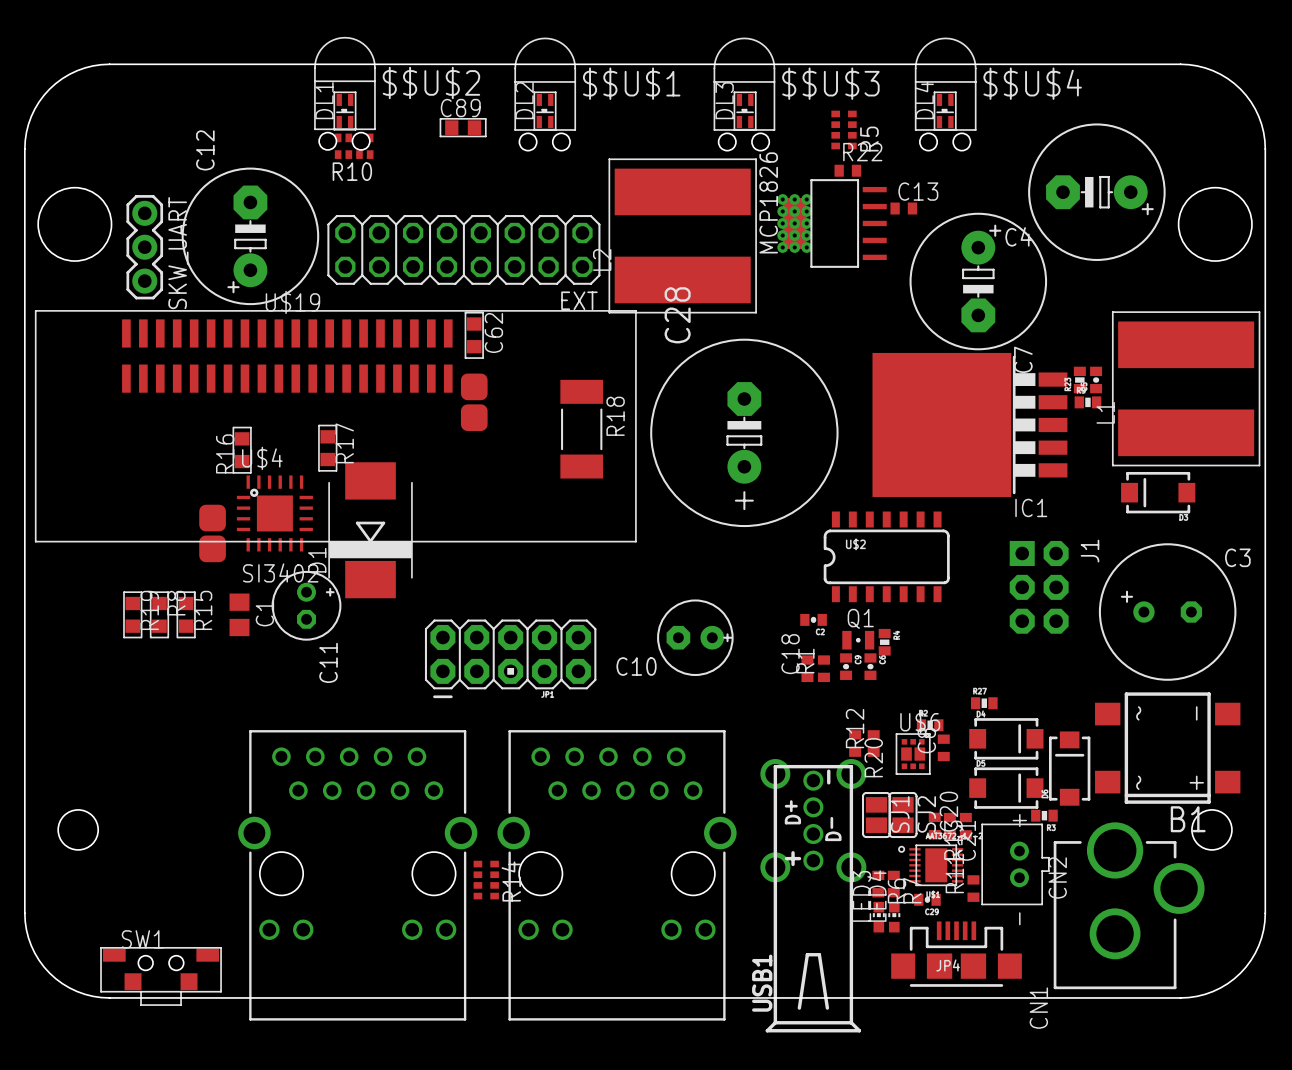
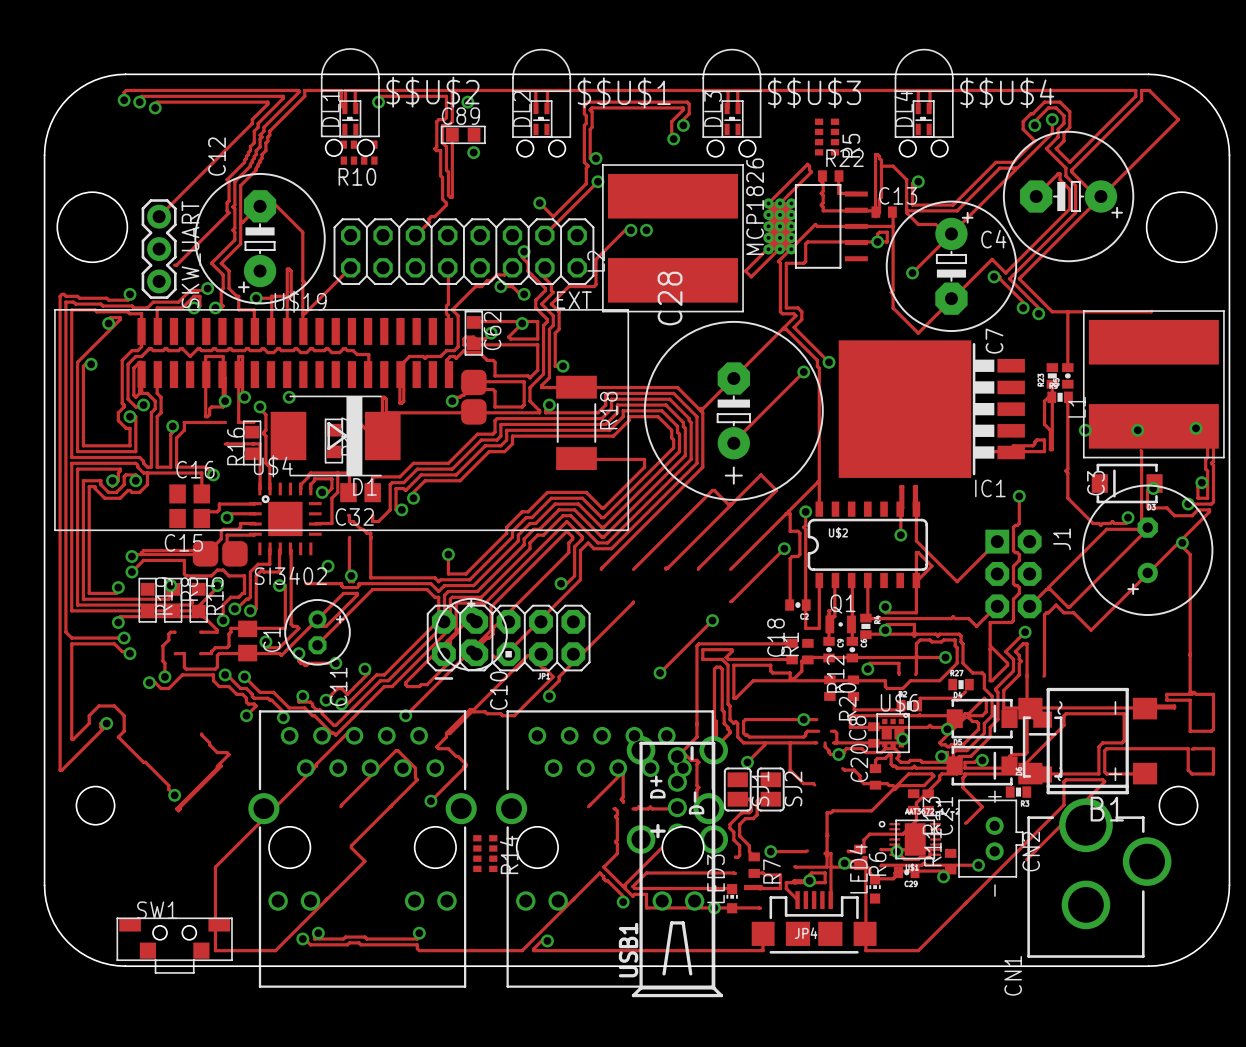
track: none -> (355, 90) (355, 108)
track: none -> (452, 90) (452, 121) (448, 125) (442, 125) (442, 142) (446, 146) (448, 195) (450, 197) (452, 197) (452, 134)
track: none -> (535, 90) (535, 108)
track: none -> (547, 90) (546, 108)
track: none -> (728, 90) (727, 108)
track: none -> (737, 90) (738, 108)
track: none -> (918, 90) (918, 108)
track: none -> (929, 90) (929, 108)
track: none -> (124, 100) (124, 92) (126, 90) (298, 90) (263, 127) (263, 131) (260, 135) (262, 137) (260, 139) (260, 146) (256, 150) (250, 166) (234, 181) (234, 205) (232, 206) (234, 208) (234, 228) (232, 230) (234, 232) (234, 239) (211, 263) (223, 274) (223, 288) (221, 290) (221, 304) (223, 306) (219, 309) (215, 307)
via: none -> (124, 100)
track: none -> (139, 102) (141, 96) (283, 96) (258, 123) (258, 127) (254, 131) (254, 142) (250, 146) (244, 162) (227, 179) (229, 181) (227, 210) (229, 212) (174, 265)
via: none -> (139, 102)
track: none -> (378, 102) (380, 96) (446, 96) (446, 117) (436, 121) (436, 146) (434, 148) (440, 150) (442, 199) (446, 205) (434, 216) (430, 216) (429, 222) (415, 235)
via: none -> (378, 102)
via: none -> (467, 102)
track: none -> (155, 107) (157, 102) (267, 102) (252, 119) (252, 123) (159, 216)
via: none -> (155, 107)
track: none -> (1052, 119) (1052, 133) (1014, 169)
via: none -> (1052, 119)
track: none -> (683, 125) (681, 121) (689, 113) (689, 104) (687, 102) (588, 102) (584, 106) (584, 113) (586, 115) (586, 123) (584, 125) (584, 162) (588, 166) (586, 168) (586, 183) (553, 216) (539, 203)
via: none -> (683, 125)
track: none -> (1034, 125) (1034, 121) (1048, 107) (1056, 107) (1063, 115) (1063, 123) (1058, 129) (1058, 137) (1046, 148) (1065, 168) (1065, 175) (1075, 185) (1075, 212) (1009, 278) (1040, 309) (1038, 313)
via: none -> (1034, 125)
track: none -> (673, 139) (671, 137) (671, 121) (683, 107) (592, 107) (590, 109) (592, 111) (590, 158) (592, 160) (596, 158)
via: none -> (673, 139)
via: none -> (473, 152)
via: none -> (596, 158)
track: none -> (881, 166) (893, 166) (906, 179) (906, 212) (918, 224) (935, 224) (949, 236) (912, 273)
track: none -> (822, 176) (823, 191) (821, 193) (823, 195) (823, 203) (821, 205) (823, 210) (873, 210) (875, 216) (879, 212) (879, 199) (881, 197) (881, 160) (877, 154) (875, 154) (875, 212)
track: none -> (838, 176) (838, 193) (856, 194)
track: none -> (597, 181) (544, 235)
via: none -> (597, 181)
track: none -> (918, 181) (912, 183) (912, 205) (953, 205) (996, 162) (1013, 162) (1034, 140) (1023, 129) (1023, 121) (1044, 102) (1060, 102) (1069, 111) (1069, 127) (1063, 133) (1063, 140) (1056, 148) (1069, 162) (1135, 96) (1135, 90) (345, 90) (344, 108) (341, 106) (341, 90) (304, 90) (304, 96) (269, 131) (265, 142) (265, 150) (262, 154) (256, 170) (240, 185) (240, 220) (242, 222) (267, 197) (302, 232) (302, 280) (304, 282) (302, 284) (303, 331)
via: none -> (918, 181)
track: none -> (1036, 196) (1060, 173) (1060, 179) (1069, 189) (1069, 208) (1005, 273) (992, 259) (918, 333) (893, 307) (893, 294) (891, 292) (893, 290) (892, 212)
track: none -> (1100, 196) (1178, 119) (1149, 90) (1141, 90) (1141, 100) (1071, 170) (1098, 199) (1019, 278) (1052, 311) (1151, 311)
via: none -> (539, 203)
track: none -> (780, 203) (811, 172) (807, 164) (768, 203)
track: none -> (906, 210) (957, 210) (999, 168) (1013, 168) (1015, 170) (951, 233)
track: none -> (241, 221) (240, 243) (221, 263) (229, 271) (229, 288) (238, 296) (238, 309) (254, 309) (254, 331)
track: none -> (856, 226) (817, 226) (815, 224) (790, 249)
track: none -> (856, 226) (893, 226)
track: none -> (630, 230) (627, 228) (596, 259) (596, 284) (594, 286) (568, 286) (551, 304) (559, 311) (559, 329) (555, 333) (555, 366) (562, 366)
via: none -> (630, 230)
via: none -> (646, 230)
track: none -> (877, 241) (887, 241) (887, 232) (879, 232) (875, 241) (807, 241) (805, 243) (805, 261) (803, 263) (786, 263) (786, 307) (797, 307) (801, 311) (801, 319) (794, 327) (829, 362)
via: none -> (877, 241)
track: none -> (768, 249) (745, 271) (751, 276) (778, 249)
track: none -> (790, 249) (778, 261) (780, 263) (780, 311) (796, 315) (700, 410) (702, 412) (702, 467) (601, 569)
track: none -> (524, 251) (522, 257) (528, 263) (528, 271) (545, 288) (535, 300) (535, 307) (547, 319) (543, 325) (543, 373) (529, 387) (529, 401) (539, 412) (388, 412) (386, 414) (386, 432) (382, 435) (386, 399) (382, 397) (382, 432) (368, 432) (353, 416) (349, 416) (348, 492)
via: none -> (524, 251)
track: none -> (350, 267) (302, 313)
track: none -> (447, 267) (448, 304) (446, 306) (446, 313) (448, 315) (449, 331)
track: none -> (512, 267) (504, 274) (496, 274) (481, 286) (475, 286) (452, 309) (458, 315) (458, 346) (454, 350) (446, 350) (440, 356) (427, 356) (425, 358) (423, 356) (409, 356) (403, 362) (403, 401) (401, 403) (399, 403) (400, 374)
track: none -> (544, 267) (539, 273) (551, 284) (553, 292) (541, 304) (553, 315) (553, 325) (549, 329) (549, 377) (541, 387) (677, 387) (701, 409)
via: none -> (912, 273)
track: none -> (994, 276) (996, 273) (1025, 304) (1023, 307)
via: none -> (994, 276)
C7 position: (978, 281) -> (951, 266)
track: none -> (500, 286) (512, 286) (520, 294) (524, 294)
via: none -> (500, 286)
track: none -> (207, 288) (205, 290) (190, 290) (178, 302) (153, 302) (147, 307) (65, 302) (65, 632) (71, 638) (118, 638) (120, 639) (124, 638)
via: none -> (207, 288)
track: none -> (129, 294) (128, 300) (79, 298) (63, 294) (60, 296) (60, 770) (102, 729) (100, 723) (102, 721) (106, 723)
via: none -> (129, 294)
via: none -> (524, 294)
track: none -> (256, 298) (271, 298)
via: none -> (256, 298)
track: none -> (194, 307) (199, 306) (199, 296) (194, 296) (182, 307) (157, 307) (157, 331)
via: none -> (194, 307)
via: none -> (215, 307)
via: none -> (1023, 307)
track: none -> (1067, 311) (1067, 367)
via: none -> (1038, 313)
track: none -> (473, 322) (537, 321) (537, 339) (510, 339) (508, 337) (522, 323)
track: none -> (108, 323) (110, 317) (120, 317) (77, 362) (77, 451) (135, 451) (135, 416) (129, 416)
via: none -> (108, 323)
via: none -> (522, 323)
track: none -> (783, 328) (817, 360) (819, 368) (819, 480) (788, 511) (790, 513) (790, 531) (797, 531) (799, 533) (799, 554) (790, 558) (789, 605)
track: none -> (141, 331) (141, 313) (71, 309) (71, 457) (139, 457) (147, 467) (151, 467) (151, 412) (155, 408) (155, 401) (147, 393) (141, 393) (139, 391) (139, 377) (141, 377) (141, 391) (135, 397) (133, 395) (133, 368) (139, 362) (141, 362) (141, 374)
track: none -> (141, 331) (141, 346) (137, 350) (131, 350) (122, 360) (122, 403) (124, 406) (118, 412) (118, 420) (126, 428) (129, 428) (129, 445) (83, 445) (83, 366) (87, 362) (91, 364)
track: none -> (287, 331) (287, 300) (293, 294) (291, 292) (291, 271) (289, 269) (287, 269) (287, 296) (271, 296) (271, 331)
track: none -> (491, 333) (485, 339) (465, 337) (463, 344) (537, 344) (537, 370) (529, 377) (528, 375) (495, 375) (495, 362) (493, 360) (487, 360) (479, 352) (465, 352) (463, 350) (456, 358) (450, 356) (446, 360) (448, 362) (449, 374)
via: none -> (491, 333)
via: none -> (829, 362)
via: none -> (91, 364)
via: none -> (562, 366)
track: none -> (803, 372) (733, 443)
via: none -> (803, 372)
track: none -> (157, 374) (157, 393) (161, 397) (161, 412) (157, 416) (157, 467) (170, 467) (170, 434) (172, 426)
track: none -> (222, 374) (223, 356) (205, 356) (205, 416) (209, 414) (211, 406) (223, 406) (223, 377) (225, 377) (225, 401)
track: none -> (368, 374) (368, 354) (357, 354) (353, 350) (345, 348) (339, 352) (331, 352) (328, 348) (324, 350) (310, 348) (306, 352) (300, 352) (296, 348) (293, 350) (277, 348) (273, 352) (267, 352) (263, 348) (260, 350) (250, 350) (248, 348) (244, 350) (232, 350) (230, 348) (227, 350) (217, 350) (215, 348) (201, 350) (197, 348) (190, 356) (182, 348) (178, 350) (168, 350) (166, 348) (153, 350) (149, 348) (141, 356) (135, 356) (128, 364) (128, 399) (135, 406) (143, 405)
track: none -> (473, 382) (524, 381) (524, 405) (522, 406) (495, 406) (495, 391) (493, 389) (469, 389) (460, 397) (454, 397) (452, 401)
track: none -> (1052, 383) (1052, 395) (1044, 401) (1044, 424) (1050, 430) (1050, 449) (1052, 449) (1051, 397)
track: none -> (244, 397) (242, 395) (242, 356) (238, 356) (238, 422) (254, 422)
via: none -> (244, 397)
via: none -> (289, 397)
track: none -> (1068, 397) (1067, 469) (1065, 471) (1067, 473) (1067, 498) (1093, 523) (1100, 525) (1112, 521) (1114, 523) (1126, 523) (1128, 517)
via: none -> (225, 401)
via: none -> (452, 401)
via: none -> (143, 405)
track: none -> (549, 405) (545, 412) (597, 412) (605, 405) (605, 395) (607, 393) (673, 393) (696, 416) (696, 463) (611, 548) (594, 548) (588, 542) (580, 550) (580, 579) (510, 649) (504, 649) (496, 657) (493, 655)
via: none -> (549, 405)
track: none -> (260, 406) (265, 414) (265, 430) (263, 434) (265, 436) (265, 463) (269, 465) (270, 488)
via: none -> (260, 406)
via: none -> (129, 416)
IC1 position: (969, 424) -> (931, 409)
track: none -> (225, 422) (184, 422) (184, 430) (176, 438) (176, 467) (205, 467) (213, 474)
via: none -> (172, 426)
C28 position: (744, 432) -> (733, 410)
track: none -> (1195, 428) (1197, 426) (1213, 426) (1213, 461) (1211, 463) (1213, 465) (1213, 502) (1211, 504) (1188, 504)
via: none -> (1195, 428)
via: none -> (1085, 430)
track: none -> (1137, 430) (1141, 428) (1180, 428) (1192, 439) (1207, 439) (1207, 457) (1205, 459) (1207, 498) (1197, 498) (1197, 486) (1201, 482)
via: none -> (1137, 430)
track: none -> (225, 444) (260, 443) (259, 488)
track: none -> (1140, 450) (1141, 531) (1143, 533) (1069, 606) (1048, 587) (1106, 529) (1137, 529) (1141, 533) (1143, 531) (1145, 531) (1147, 527)
track: none -> (980, 451) (1007, 451) (1013, 445) (1032, 445) (1036, 439) (1044, 439) (1044, 451) (1011, 452)
track: none -> (576, 458) (644, 459) (644, 467) (603, 507) (586, 492) (547, 492) (528, 511) (522, 511) (506, 527) (506, 533) (465, 573) (448, 573) (448, 554)
track: none -> (147, 473) (147, 484) (139, 492) (128, 490) (120, 498) (104, 498) (95, 486) (89, 486) (89, 593) (116, 593) (118, 587)
track: none -> (337, 473) (337, 492) (331, 498) (331, 523) (315, 524)
track: none -> (349, 473) (310, 473) (300, 484) (300, 488)
via: none -> (213, 474)
track: none -> (112, 480) (108, 482) (112, 486) (118, 480) (120, 469) (77, 469) (77, 605) (190, 605) (192, 603) (190, 599)
via: none -> (112, 480)
track: none -> (135, 480) (137, 476) (135, 474) (126, 474) (124, 476) (124, 484) (116, 492) (108, 492) (100, 484) (100, 480) (83, 480) (83, 599) (168, 599) (170, 597) (170, 585)
via: none -> (135, 480)
track: none -> (818, 481) (819, 507)
via: none -> (1201, 482)
track: none -> (1153, 488) (1147, 490) (1147, 507) (1166, 507) (1174, 515) (1192, 515) (1197, 509) (1209, 509) (1180, 540) (1182, 542)
via: none -> (1153, 488)
track: none -> (310, 488) (310, 484) (314, 478) (331, 478) (331, 488) (328, 492) (322, 492)
via: none -> (322, 492)
C32: none -> (360, 492)
track: none -> (372, 492) (372, 476) (399, 476) (413, 463) (448, 463) (477, 434) (493, 434) (496, 418) (601, 418) (611, 408) (611, 399) (669, 399) (691, 422) (691, 459) (607, 542) (597, 542) (570, 515) (562, 515) (543, 535) (537, 535) (529, 542) (529, 548) (481, 597) (452, 597) (450, 599) (450, 628) (392, 686) (384, 686) (335, 735) (304, 707) (289, 707) (273, 692) (260, 692) (244, 676)
C16: none -> (189, 493)
track: none -> (201, 493) (201, 473) (143, 473) (135, 463) (71, 463) (71, 610) (194, 610) (217, 585)
track: none -> (1019, 496) (1019, 523) (1013, 527) (1013, 550) (1019, 554) (1019, 560) (1013, 566) (1013, 583) (1019, 587) (1019, 593) (1013, 599) (1013, 620) (1011, 622) (990, 622) (990, 645) (1007, 663) (992, 680) (990, 680) (989, 648)
via: none -> (1019, 496)
track: none -> (413, 498) (411, 494) (425, 480) (460, 480) (489, 451) (504, 451) (512, 443) (512, 436) (613, 436) (629, 420) (629, 416) (658, 416) (671, 430) (673, 447) (603, 517) (582, 498) (551, 498) (531, 517) (526, 517) (512, 531) (512, 537) (469, 579) (440, 579) (438, 581) (434, 577) (370, 577) (370, 533) (366, 533) (353, 521) (349, 521) (348, 515)
via: none -> (413, 498)
track: none -> (255, 503) (219, 504) (217, 511) (201, 511) (201, 518)
U$4 position: (274, 513) -> (285, 518)
via: none -> (1188, 504)
track: none -> (729, 505) (761, 474) (776, 490) (698, 569)
track: none -> (900, 507) (900, 486) (902, 486) (900, 535)
track: none -> (916, 507) (916, 486) (914, 486) (916, 540) (957, 581) (997, 541)
track: none -> (401, 509) (396, 509) (396, 488) (403, 488) (405, 490) (421, 474) (456, 474) (485, 445) (500, 445) (506, 439) (506, 430) (609, 430) (623, 416) (623, 410) (662, 410) (677, 426) (679, 451) (603, 527) (578, 504) (555, 504) (535, 523) (529, 523) (518, 535) (518, 540) (473, 585) (444, 585) (438, 591) (430, 583) (359, 583) (357, 587) (343, 587) (341, 583) (306, 583)
via: none -> (401, 509)
track: none -> (805, 511) (805, 525) (803, 527) (805, 529) (805, 628) (819, 628) (819, 578)
via: none -> (805, 511)
track: none -> (789, 512) (730, 569)
track: none -> (255, 513) (225, 513) (227, 517)
track: none -> (372, 515) (372, 521) (378, 521) (390, 509) (390, 484) (392, 482) (403, 482) (417, 469) (452, 469) (481, 439) (496, 439) (500, 436) (500, 424) (605, 424) (617, 412) (617, 405) (665, 405) (683, 422) (685, 428) (685, 455) (603, 537) (574, 509) (559, 509) (539, 529) (533, 529) (524, 539) (524, 544) (477, 591) (448, 591) (444, 595) (444, 624) (388, 680) (380, 680) (335, 725) (320, 709) (316, 709) (310, 702) (298, 702) (302, 696)
via: none -> (227, 517)
via: none -> (1128, 517)
C15: none -> (189, 518)
D1 rotation: 0° (370, 530) -> 90° counterclockwise (335, 435)
D1 position: (370, 530) -> (335, 435)
part rotation: 0° (212, 533) -> 90° clockwise (220, 553)
track: none -> (255, 524) (240, 523) (238, 529) (223, 529) (221, 531) (221, 539) (209, 550) (143, 550) (141, 554)
track: none -> (255, 534) (227, 535) (227, 552) (229, 554) (234, 553)
via: none -> (900, 535)
track: none -> (349, 537) (349, 581) (353, 581) (351, 575)
via: none -> (1182, 542)
track: none -> (784, 548) (730, 601)
via: none -> (784, 548)
track: none -> (270, 548) (269, 564) (258, 564) (250, 572) (250, 597) (234, 608)
track: none -> (280, 548) (279, 572) (263, 572) (262, 570) (256, 575) (256, 608) (250, 610)
track: none -> (290, 548) (291, 624) (298, 628) (279, 647) (265, 647) (265, 641)
track: none -> (205, 553) (133, 554) (131, 556)
via: none -> (448, 554)
via: none -> (131, 556)
via: none -> (328, 566)
track: none -> (633, 569) (714, 490) (729, 506) (665, 569)
track: none -> (131, 572) (143, 560) (184, 560) (184, 573) (186, 575) (211, 575) (217, 570) (223, 570) (229, 575) (244, 575) (244, 593) (238, 597) (230, 597) (223, 605) (223, 620)
via: none -> (131, 572)
via: none -> (351, 575)
track: none -> (835, 578) (834, 616) (829, 616) (829, 610) (829, 610) (829, 641)
track: none -> (851, 578) (852, 641)
track: none -> (867, 578) (867, 618) (865, 618) (865, 618) (951, 618) (953, 616) (955, 618) (968, 618) (976, 626) (997, 606)
track: none -> (916, 578) (916, 552) (918, 552) (931, 566) (916, 581) (916, 612) (885, 612) (885, 606)
track: none -> (561, 583) (564, 585) (574, 575) (574, 546) (582, 539) (566, 521) (483, 605) (481, 603) (456, 603) (456, 630) (458, 632) (450, 639) (450, 661) (427, 684) (407, 686) (405, 682) (469, 618) (471, 618)
via: none -> (561, 583)
via: none -> (170, 585)
via: none -> (217, 585)
track: none -> (279, 585) (285, 585) (285, 628) (230, 628) (229, 645) (227, 647) (215, 647) (211, 653) (200, 653)
via: none -> (279, 585)
via: none -> (118, 587)
track: none -> (1049, 588) (1029, 606)
C11 position: (306, 605) -> (317, 632)
C3 rotation: 0° (1167, 612) -> 90° counterclockwise (1147, 550)
C1 position: (239, 614) -> (247, 640)
track: none -> (633, 601) (559, 676) (559, 680) (547, 692) (549, 696)
via: none -> (885, 606)
via: none -> (234, 608)
via: none -> (250, 610)
track: none -> (317, 619) (343, 593) (357, 593) (326, 626) (318, 626) (314, 622) (281, 655) (279, 653) (219, 653) (215, 669) (186, 669) (184, 667) (184, 653) (175, 653)
via: none -> (223, 620)
track: none -> (712, 620) (660, 672)
via: none -> (712, 620)
C10 rotation: 0° (695, 637) -> 90° counterclockwise (471, 634)
C10 position: (695, 637) -> (471, 634)
track: none -> (118, 622) (120, 616) (197, 616) (199, 614) (217, 630) (217, 632) (200, 632)
via: none -> (118, 622)
track: none -> (885, 630) (887, 624) (914, 624) (914, 634) (865, 634)
via: none -> (885, 630)
track: none -> (175, 632) (168, 634) (168, 639) (163, 645) (164, 676)
track: none -> (1025, 632) (1005, 651) (1013, 659) (1013, 671) (996, 688) (997, 692) (997, 719) (990, 727) (990, 737) (970, 756) (959, 756) (959, 772) (957, 773) (941, 773) (939, 775) (939, 779) (916, 803) (916, 820) (902, 834) (869, 834) (863, 839) (863, 851) (848, 850)
via: none -> (1025, 632)
track: none -> (912, 634) (914, 636) (916, 634) (935, 634) (937, 636) (939, 634) (959, 634) (961, 636) (962, 663) (972, 672) (982, 672) (984, 674) (984, 688) (992, 696) (992, 715) (984, 723) (984, 733) (966, 750) (955, 750) (953, 752) (953, 768) (916, 768) (914, 766) (912, 768) (896, 768) (891, 764) (891, 754) (889, 754) (885, 758) (877, 758) (875, 760) (875, 768)
via: none -> (124, 638)
via: none -> (265, 641)
track: none -> (786, 643) (698, 643) (696, 645) (696, 737) (677, 756)
track: none -> (317, 645) (372, 589) (427, 589) (434, 597) (438, 597) (438, 620) (384, 674) (376, 674) (345, 706) (341, 704)
track: none -> (471, 650) (471, 649) (568, 552) (568, 542) (572, 537) (566, 531) (491, 606) (491, 628) (493, 630) (493, 634) (471, 653) (467, 653) (405, 715)
track: none -> (129, 653) (122, 651) (114, 643) (71, 643) (71, 739) (89, 723) (89, 715) (98, 706) (114, 706) (124, 715) (124, 731) (118, 737) (168, 785) (168, 789) (174, 795)
via: none -> (129, 653)
track: none -> (298, 653) (298, 661) (304, 665) (308, 663) (335, 663)
via: none -> (298, 653)
track: none -> (945, 657) (918, 657) (916, 655) (916, 643) (920, 639) (929, 639) (931, 641) (955, 639) (957, 663) (939, 680) (910, 680) (902, 688) (887, 688) (885, 680) (753, 680) (733, 698) (733, 665) (770, 665) (772, 672) (790, 672) (790, 678) (794, 678) (801, 671) (803, 657) (809, 657) (807, 659) (811, 657) (916, 657) (915, 674)
via: none -> (945, 657)
track: none -> (786, 659) (728, 659) (726, 657) (731, 649) (702, 649) (702, 659) (722, 659) (728, 665) (729, 719) (733, 723) (735, 721) (737, 723) (737, 737) (743, 742) (816, 742)
via: none -> (335, 663)
track: none -> (364, 669) (368, 672) (347, 694) (341, 688) (337, 688) (326, 700)
via: none -> (364, 669)
track: none -> (867, 669) (869, 663) (898, 663) (899, 674)
via: none -> (867, 669)
via: none -> (660, 672)
track: none -> (225, 674) (240, 688) (246, 688) (254, 698) (267, 698) (271, 700) (285, 713) (283, 717)
via: none -> (225, 674)
track: none -> (1043, 676) (1044, 614) (1046, 612) (1056, 605) (1063, 612) (1073, 612) (1091, 630) (1178, 542) (1190, 554) (1190, 692) (1213, 694) (1213, 729) (1211, 731) (1190, 731) (1190, 700) (1166, 700) (1166, 694) (1192, 694)
via: none -> (164, 676)
via: none -> (244, 676)
track: none -> (149, 682) (155, 682) (161, 688) (168, 688) (182, 674) (213, 674) (213, 680) (219, 686) (229, 686) (236, 694) (242, 694) (248, 704) (256, 706) (246, 715)
via: none -> (149, 682)
track: none -> (965, 691) (957, 700) (955, 698) (919, 698)
via: none -> (302, 696)
via: none -> (549, 696)
track: none -> (853, 696) (854, 709) (902, 709) (904, 704)
via: none -> (326, 700)
via: none -> (341, 704)
track: none -> (1145, 708) (1174, 707) (1174, 706) (1143, 706) (1141, 707) (1027, 707) (1027, 643) (1023, 643) (1015, 651) (1021, 661) (1019, 663) (1019, 674) (1003, 690) (1003, 707) (1025, 707) (1027, 709) (1027, 752) (1025, 754) (1011, 754) (1007, 768) (964, 768) (964, 762) (974, 762) (978, 758) (982, 760)
via: none -> (246, 715)
via: none -> (405, 715)
via: none -> (283, 717)
track: none -> (965, 717) (953, 729) (951, 727) (931, 727) (929, 725) (928, 727) (850, 727) (850, 717) (852, 715) (962, 715) (968, 713) (984, 698) (986, 700) (986, 711) (982, 715) (968, 715) (972, 721) (978, 723) (978, 729) (962, 744) (951, 744) (949, 746) (941, 744) (939, 742) (951, 731) (947, 729)
via: none -> (803, 719)
track: none -> (816, 719) (745, 719) (743, 721) (743, 733) (749, 737) (803, 737) (807, 731) (818, 731)
via: none -> (106, 723)
track: none -> (714, 723) (714, 744) (716, 746) (729, 733) (724, 723) (722, 669) (720, 667) (714, 669) (714, 719) (716, 721) (716, 740) (718, 742) (714, 746) (713, 750)
R20 position: (855, 743) -> (829, 688)
R12 position: (873, 743) -> (853, 688)
C8 position: (943, 747) -> (873, 735)
B1 position: (1167, 748) -> (1087, 741)
via: none -> (947, 729)
track: none -> (355, 731) (351, 729) (215, 867) (215, 950) (275, 950) (364, 861) (351, 845) (417, 779) (415, 777) (415, 768) (396, 750) (340, 806)
track: none -> (831, 731) (836, 733) (836, 742)
track: none -> (201, 733) (217, 752) (227, 752) (229, 754) (219, 764) (221, 766) (178, 810) (176, 808) (217, 766)
track: none -> (449, 733) (450, 733) (528, 655) (553, 676) (514, 715) (487, 713) (485, 711) (473, 711) (471, 709) (469, 709) (446, 733) (446, 737) (436, 746) (438, 748) (448, 748) (465, 766) (430, 801)
track: none -> (902, 739) (900, 742) (833, 742)
via: none -> (902, 739)
track: none -> (764, 742) (747, 762)
track: none -> (790, 742) (790, 770) (803, 783) (814, 785)
track: none -> (825, 742) (825, 746) (830, 754) (842, 754) (846, 748) (862, 748) (865, 752) (881, 752) (885, 748) (895, 748) (898, 752) (896, 758) (900, 762) (908, 762) (910, 760) (947, 762) (947, 752) (941, 756)
track: none -> (1192, 749) (1213, 748) (1213, 773) (1192, 773) (1188, 770) (1188, 748) (1106, 748) (1104, 750) (1104, 772) (1106, 773) (1145, 773)
via: none -> (838, 754)
track: none -> (677, 756) (683, 752) (691, 760) (698, 762) (696, 764) (696, 785) (698, 787) (696, 789) (696, 801) (706, 801) (716, 808)
via: none -> (941, 756)
via: none -> (982, 760)
via: none -> (747, 762)
track: none -> (842, 768) (854, 770) (863, 783) (875, 785) (887, 783) (895, 787) (908, 773) (931, 773) (933, 775) (924, 785) (898, 785) (871, 810) (832, 810) (827, 812) (827, 851) (825, 853) (827, 855)
track: none -> (1030, 773) (1098, 773) (1098, 746) (1102, 742) (1122, 742) (1124, 740) (1124, 713) (1065, 713) (1063, 715) (1063, 725) (1015, 773) (964, 773) (962, 787) (982, 806) (965, 823)
SJ1 position: (876, 815) -> (737, 789)
SJ2 position: (902, 815) -> (770, 789)
via: none -> (174, 795)
track: none -> (737, 799) (749, 799) (751, 801) (751, 810) (749, 812) (741, 812) (729, 824) (729, 828) (733, 832) (733, 839) (739, 845) (739, 855) (735, 856)
track: none -> (770, 799) (759, 799) (757, 801) (757, 814) (753, 818) (745, 818) (739, 824) (739, 836) (749, 845) (749, 851) (754, 856)
via: none -> (430, 801)
track: none -> (623, 802) (621, 799) (623, 797) (623, 773) (621, 773) (588, 806)
C20 position: (965, 826) -> (875, 776)
track: none -> (677, 807) (673, 810) (671, 808) (652, 808) (650, 806) (648, 808) (640, 808) (638, 806) (632, 808)
track: none -> (613, 808) (617, 810) (615, 816) (617, 818) (617, 839) (615, 841) (617, 843) (617, 853) (603, 867) (623, 886) (677, 833)
track: none -> (880, 849) (929, 849) (929, 855) (918, 859) (904, 859) (896, 851)
track: none -> (807, 850) (770, 851)
via: none -> (770, 851)
via: none -> (896, 851)
R7 position: (893, 884) -> (754, 865)
track: none -> (1026, 859) (1104, 781) (1102, 779) (1065, 779) (1063, 781) (1063, 805) (918, 950) (865, 950) (865, 867) (830, 867)
track: none -> (844, 863) (846, 861) (860, 861) (865, 857) (865, 865) (875, 878) (893, 878) (896, 871) (943, 871) (943, 876)
via: none -> (844, 863)
track: none -> (978, 865) (926, 865) (924, 863) (922, 865) (880, 866)
via: none -> (978, 865)
track: none -> (794, 866) (827, 867) (827, 853) (830, 853) (830, 900)
USB1 position: (813, 895) -> (677, 866)
track: none -> (735, 873) (646, 872) (632, 886) (634, 888) (732, 889)
track: none -> (754, 873) (780, 874) (780, 888) (745, 886) (745, 888) (760, 889)
via: none -> (943, 876)
via: none -> (809, 880)
track: none -> (794, 883) (825, 882) (825, 872) (811, 872) (807, 880) (786, 882) (786, 888) (797, 900)
track: none -> (624, 885) (632, 896) (634, 894) (646, 894) (646, 907) (760, 908)
LED3 position: (878, 917) -> (732, 898)
track: none -> (623, 902) (627, 900) (599, 872) (522, 950) (419, 950) (417, 944) (361, 944) (359, 942) (310, 944) (302, 939)
via: none -> (623, 902)
via: none -> (714, 907)
JP4 position: (956, 954) -> (814, 922)
track: none -> (318, 933) (314, 939) (343, 939) (345, 937) (417, 939) (419, 933)
via: none -> (318, 933)
via: none -> (419, 933)
track: none -> (763, 933) (762, 950) (533, 950) (543, 939) (547, 940)
via: none -> (302, 939)
via: none -> (547, 940)

